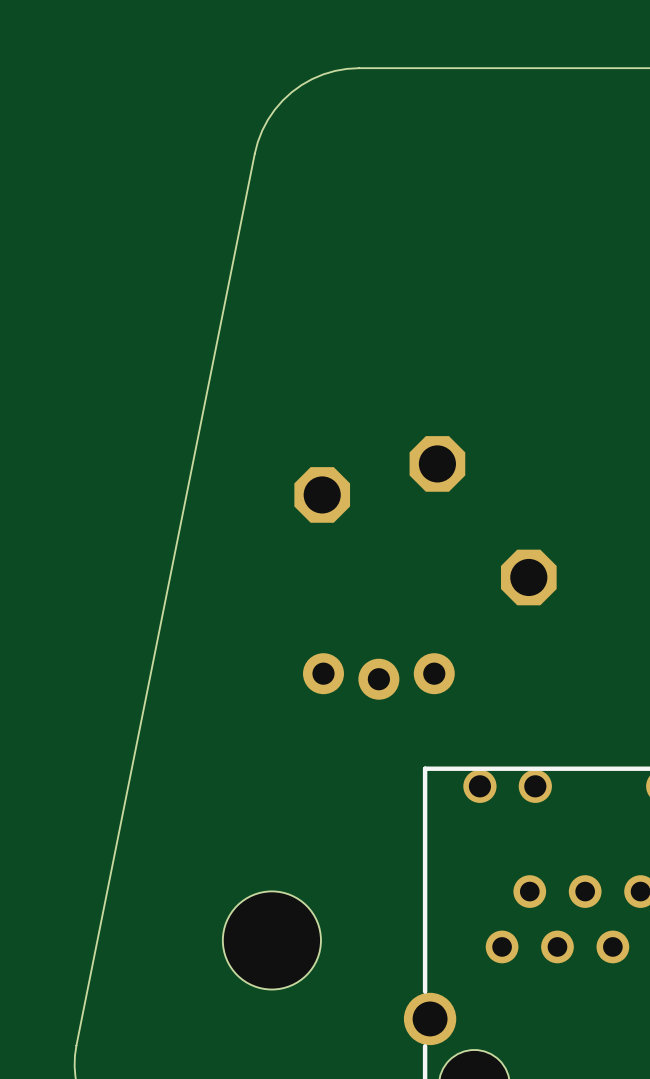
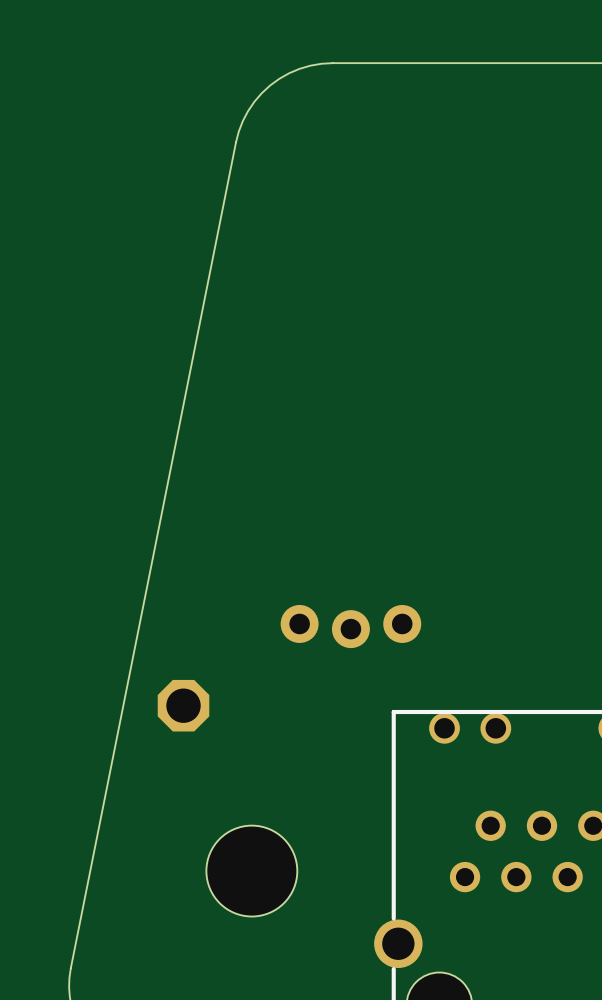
part: (437, 463) -> none
part: (322, 494) -> none
part: (528, 577) -> none
part: none -> (183, 705)

